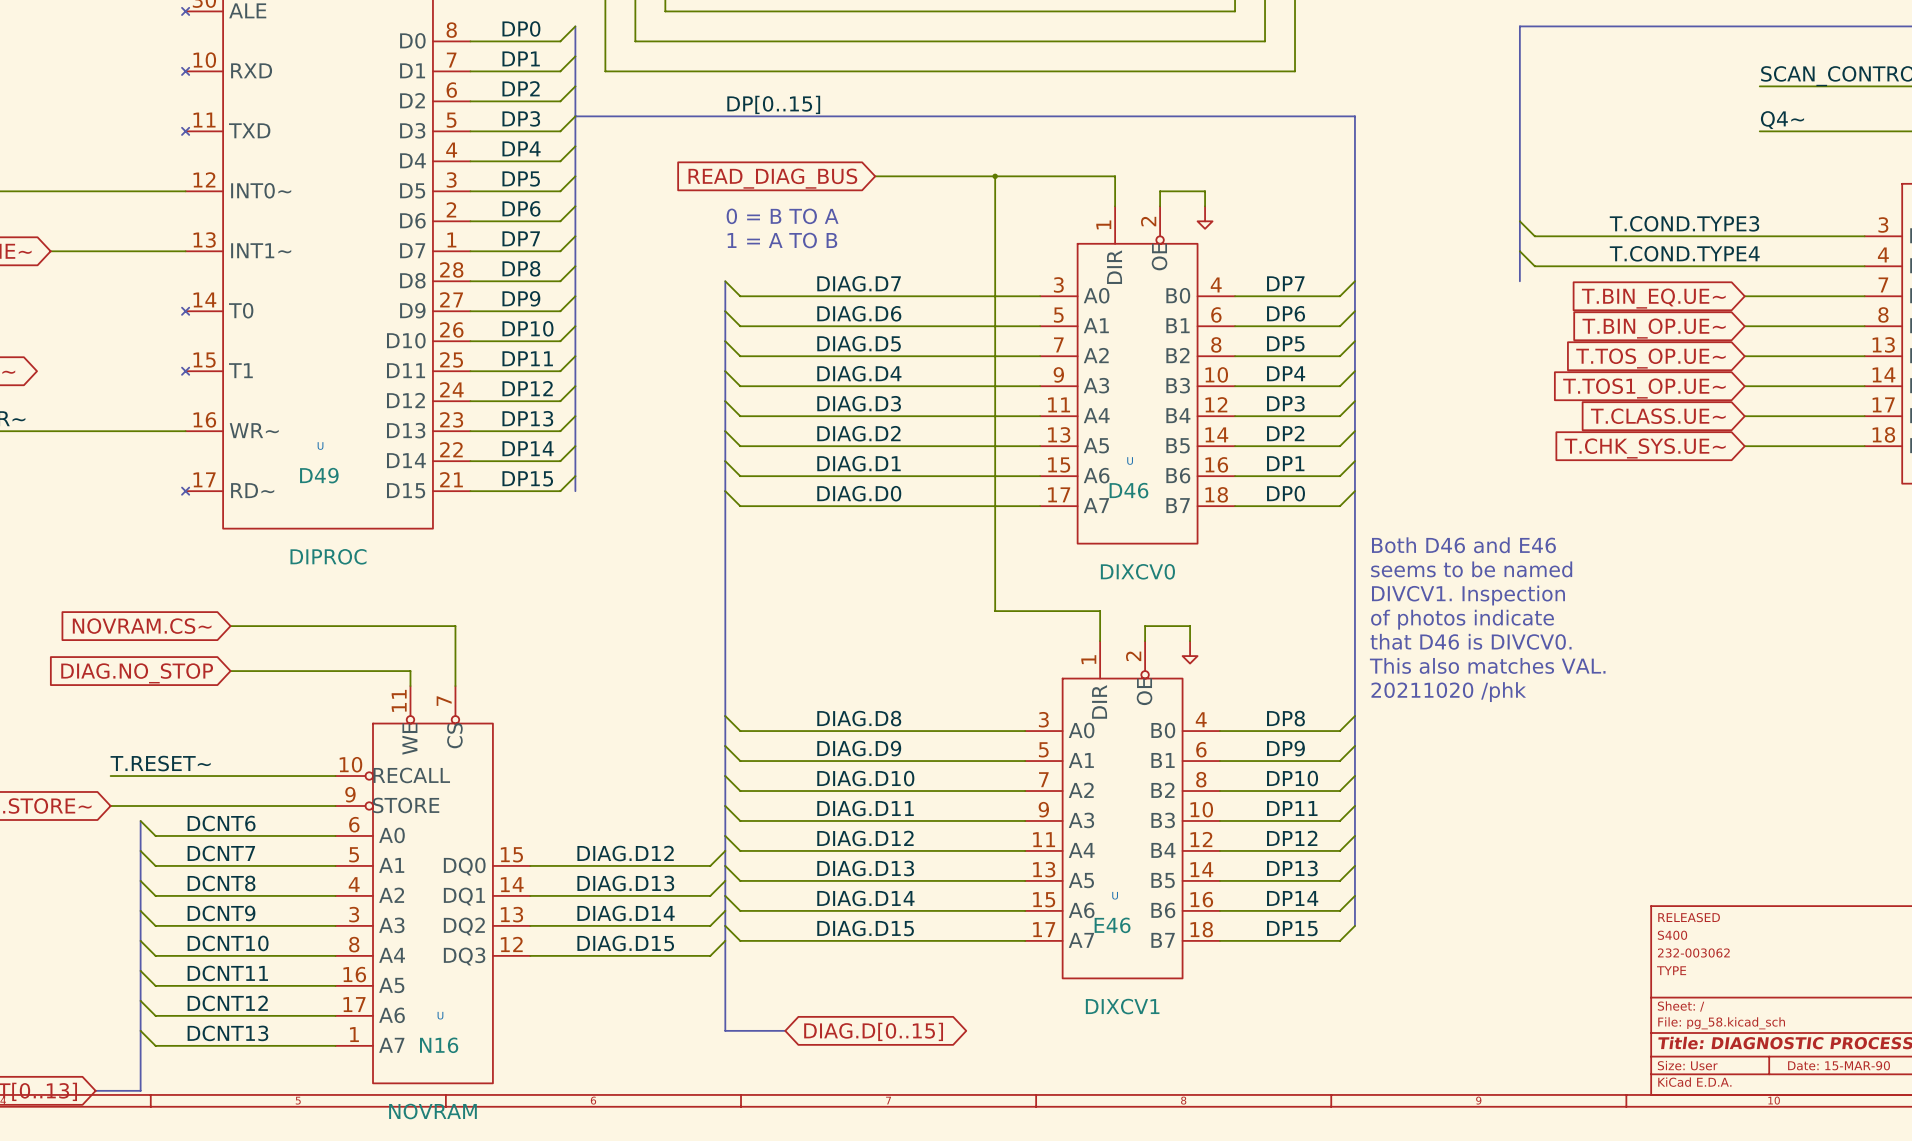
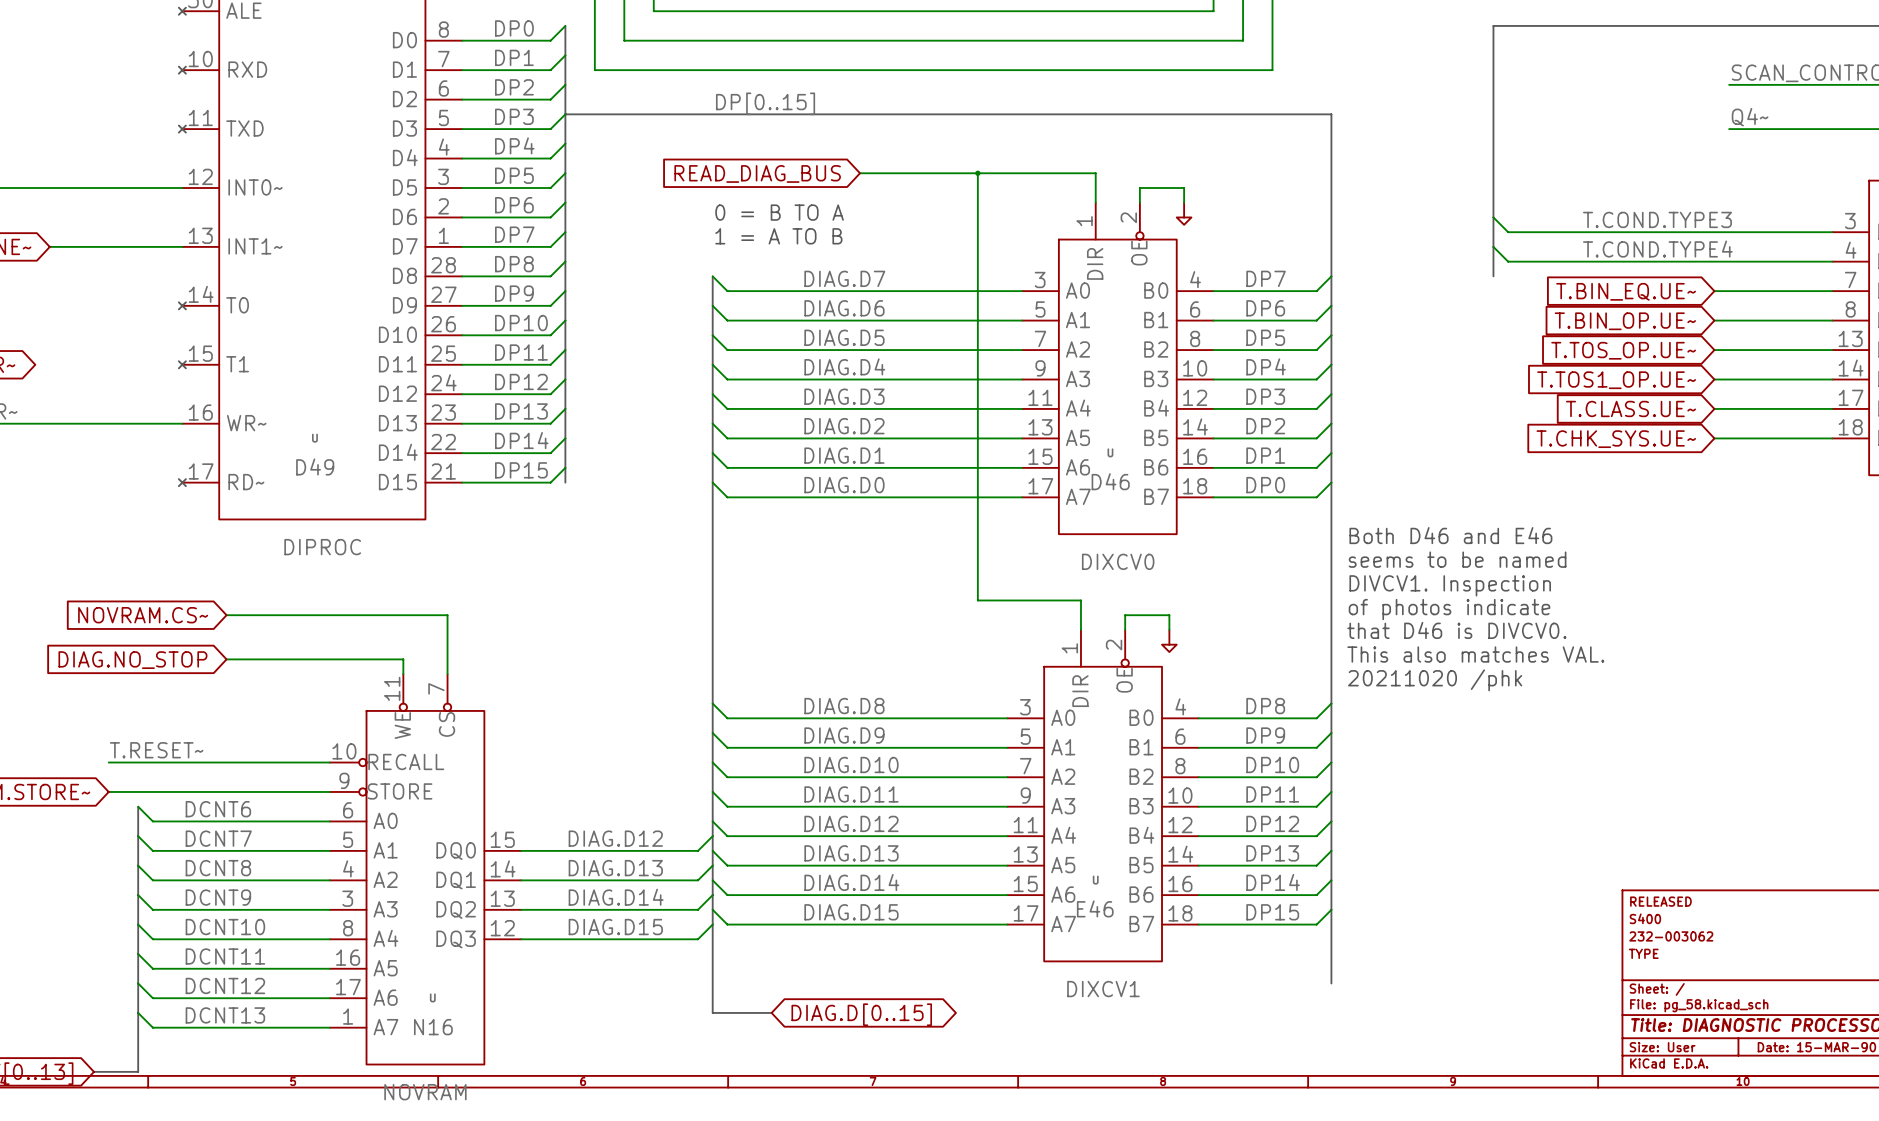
bus: none -> (1331, 909) (1331, 983)

